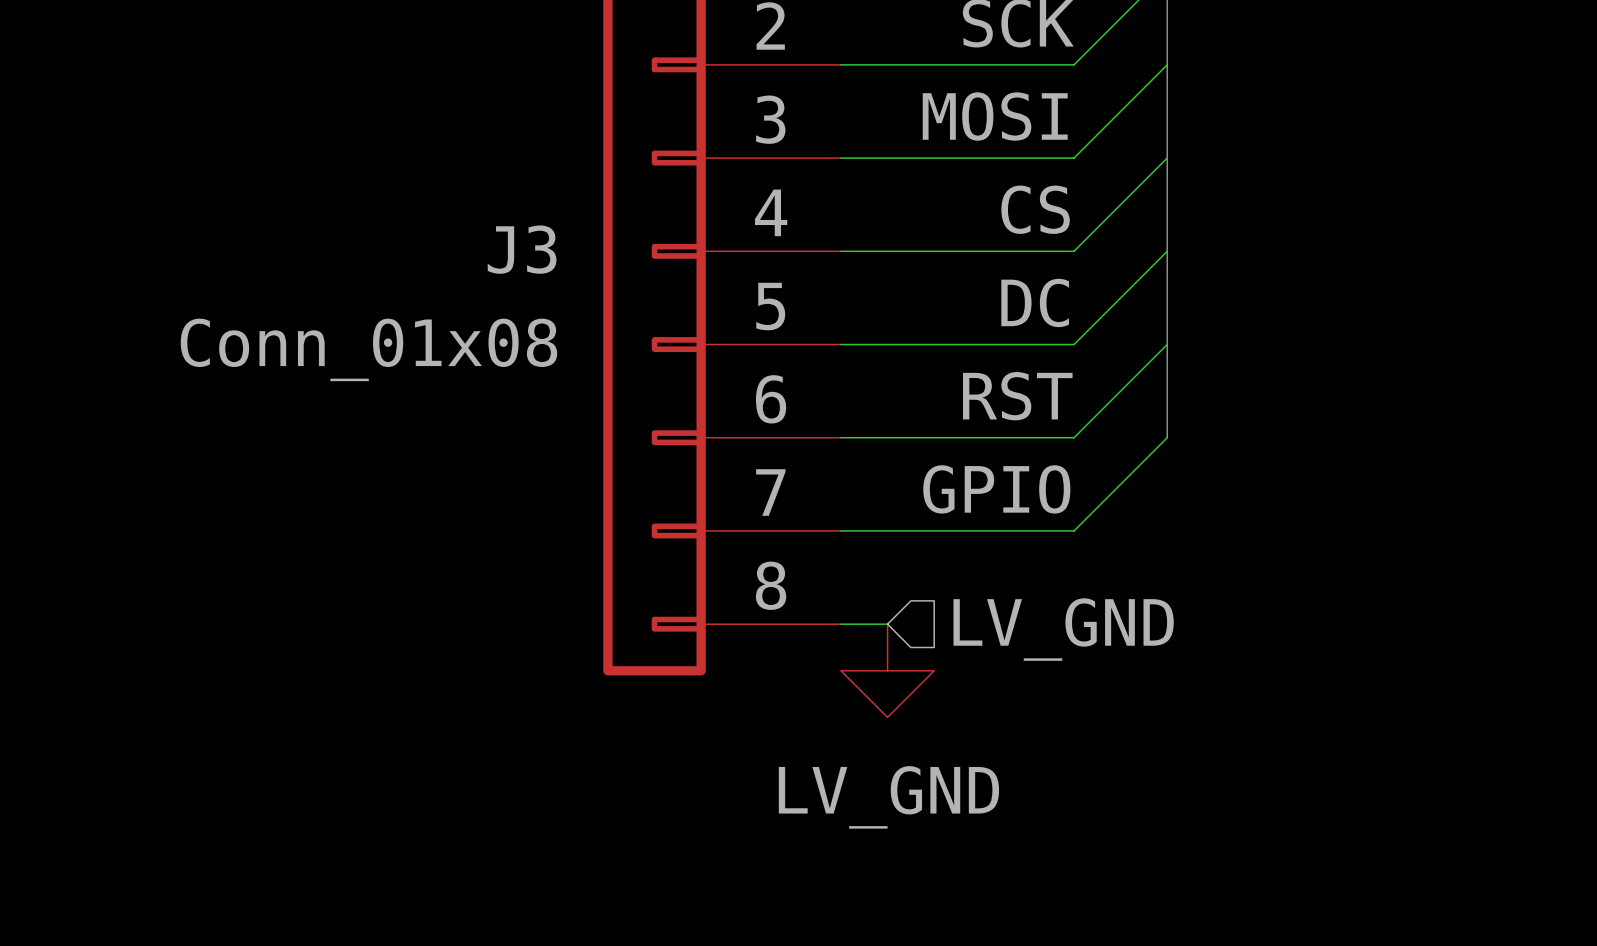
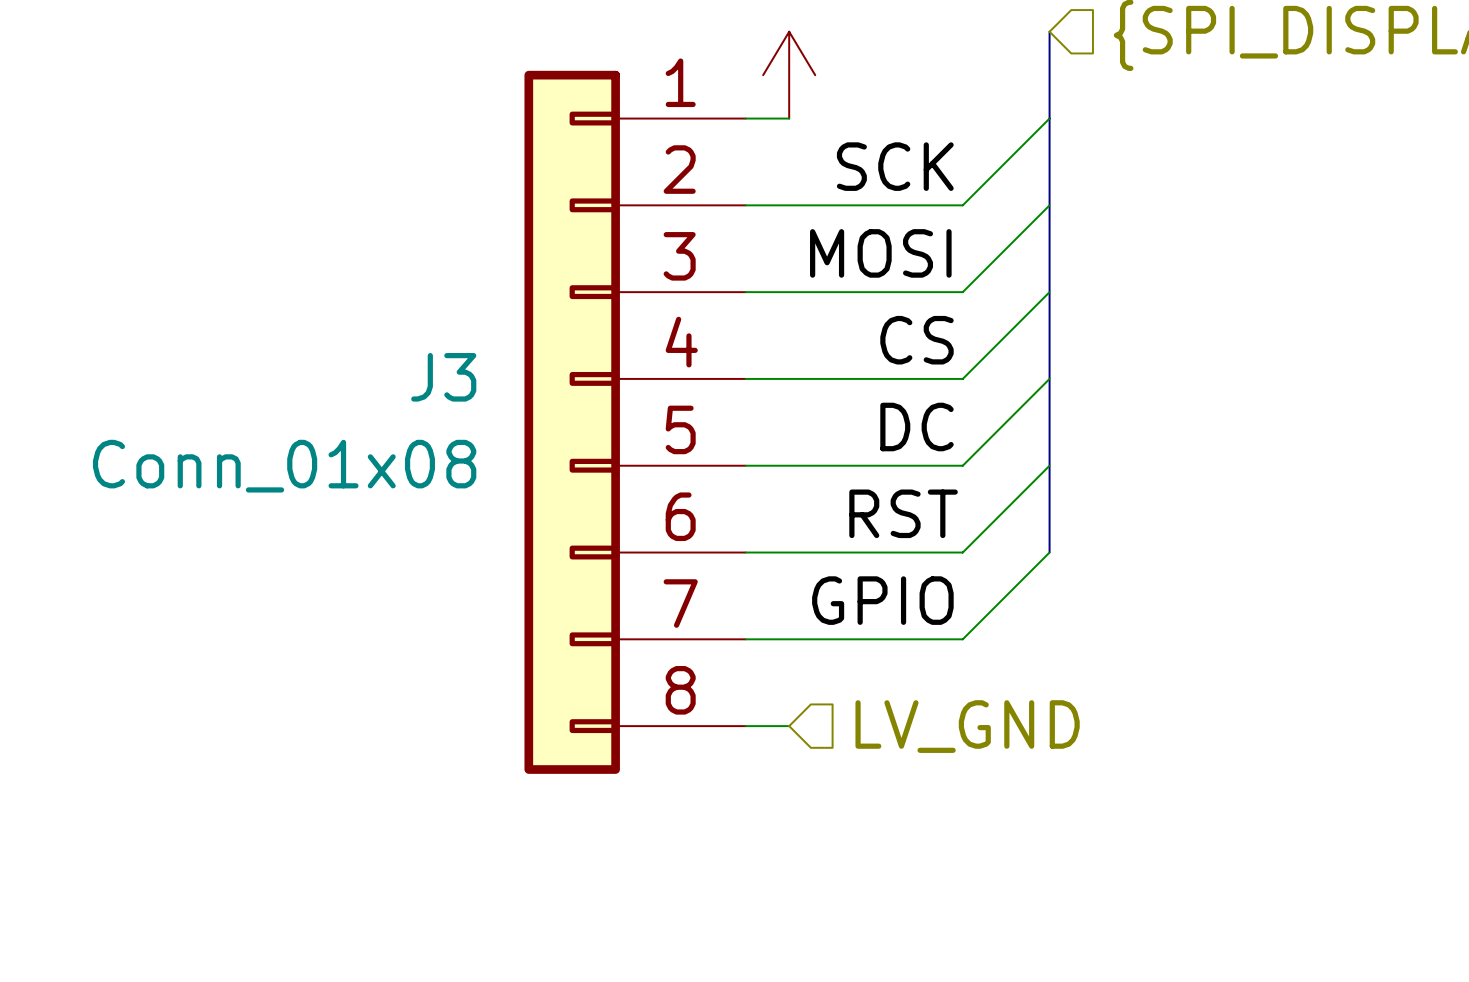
power symbol: LV_GND (887, 670) -> none

